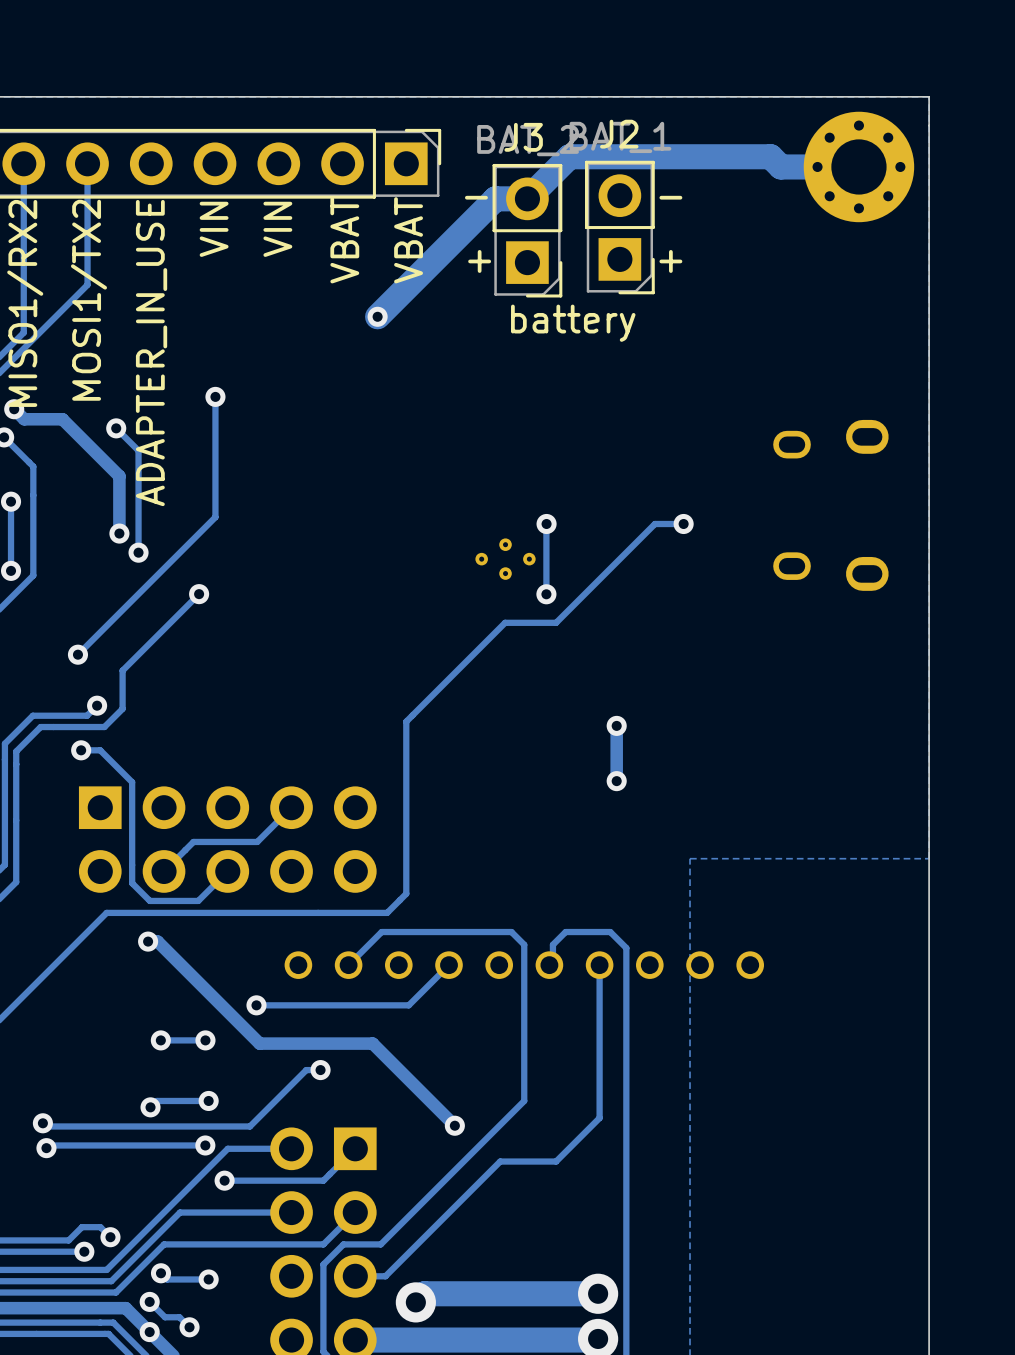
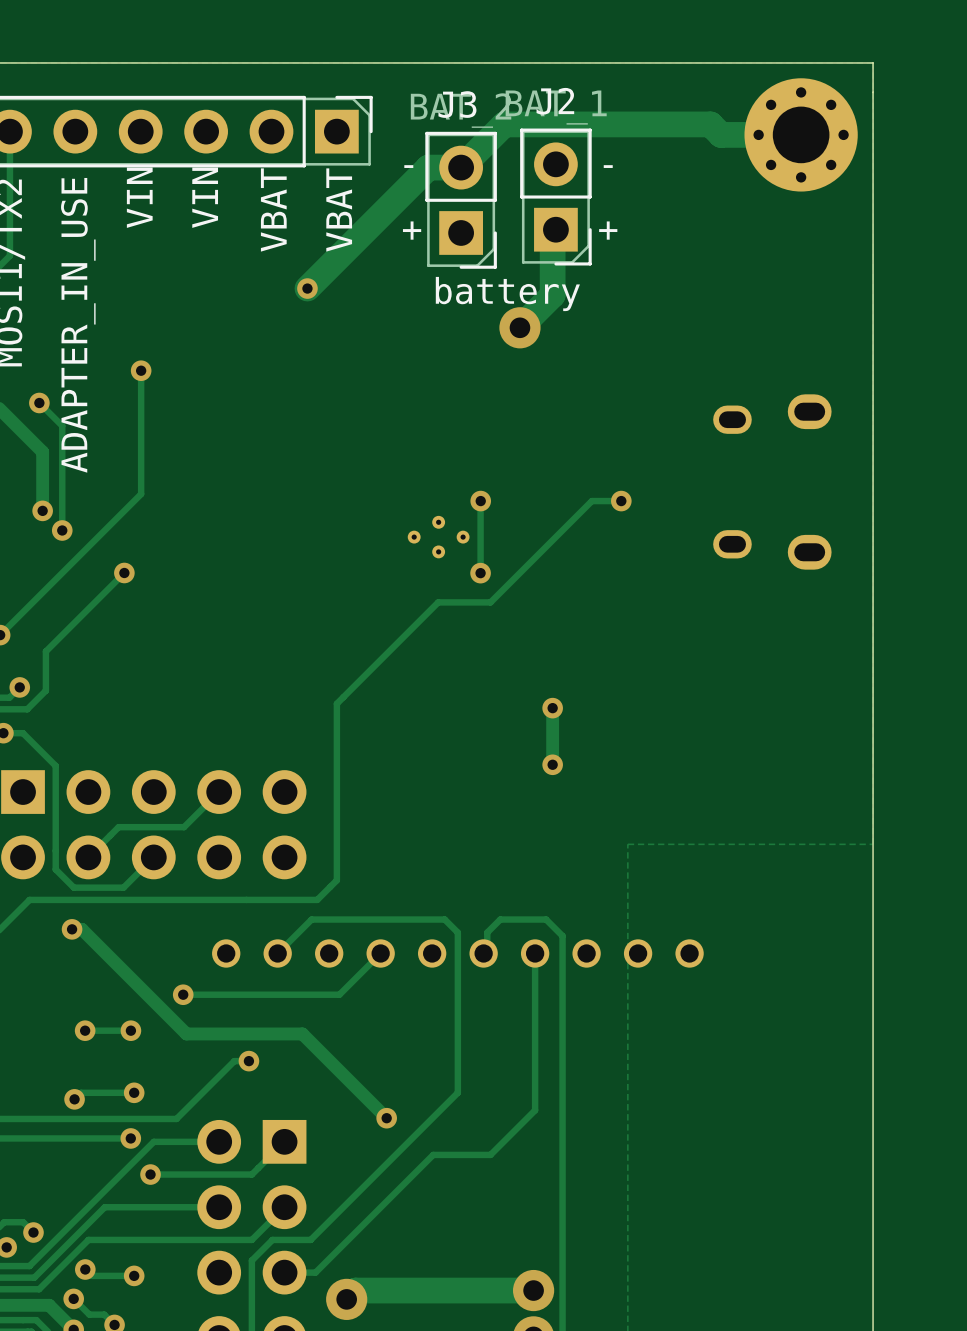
track: none -> (555, 229) (552, 232) (552, 295) (519, 327)
via: none -> (519, 327)

